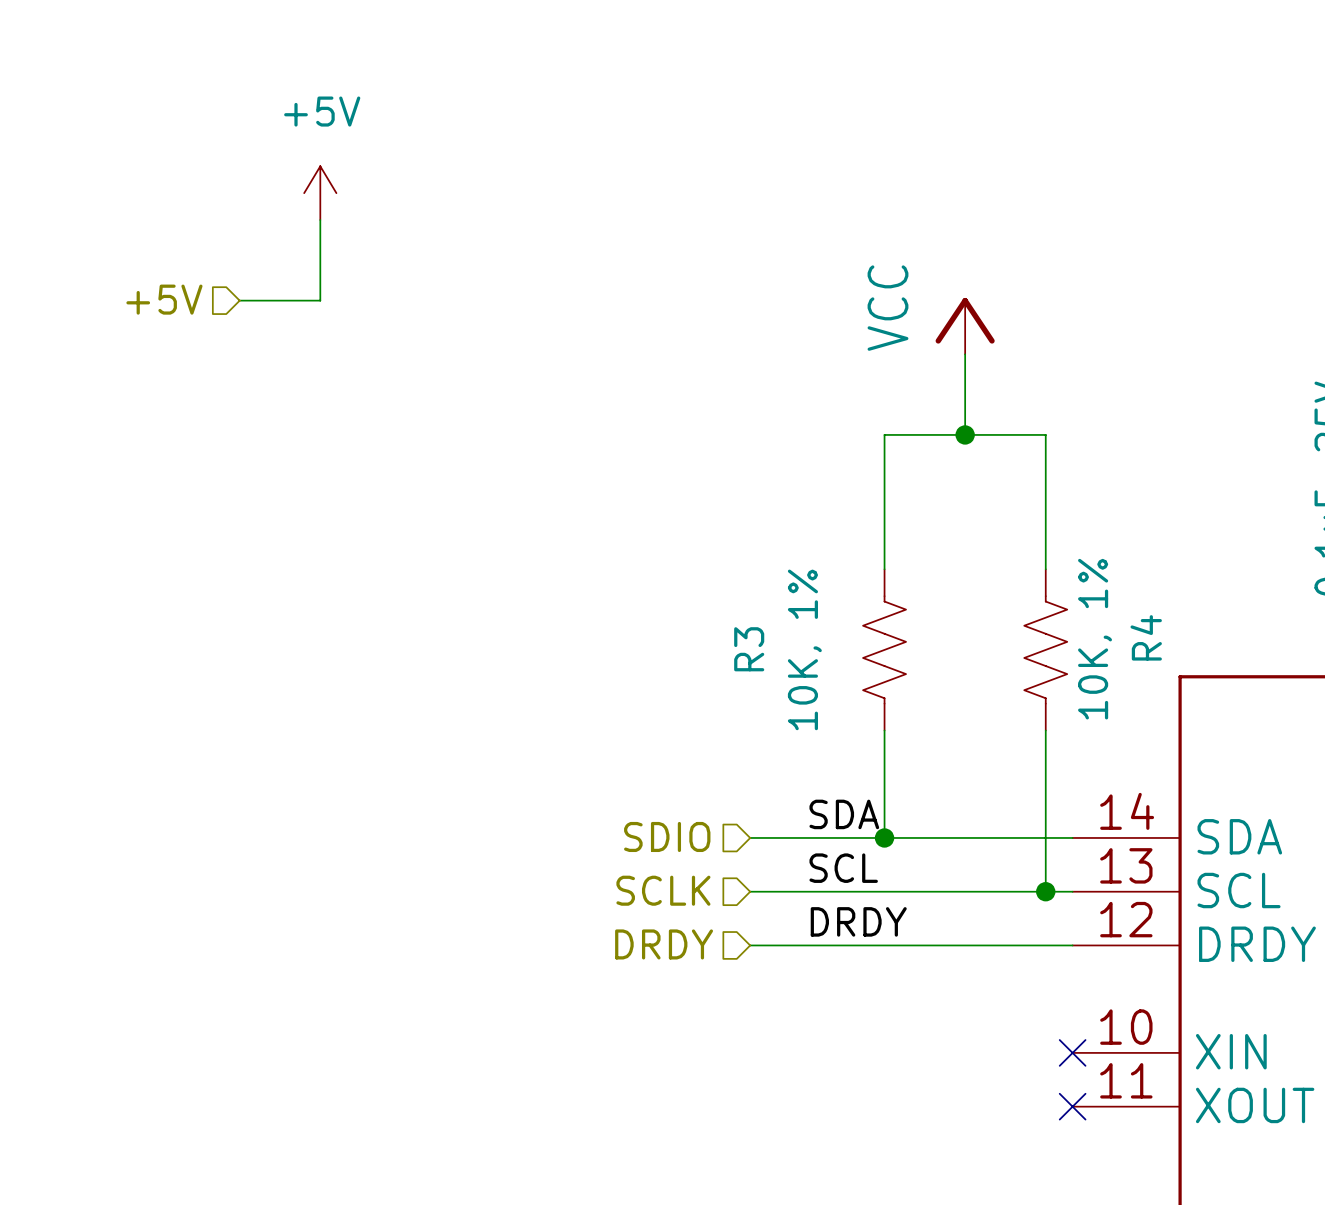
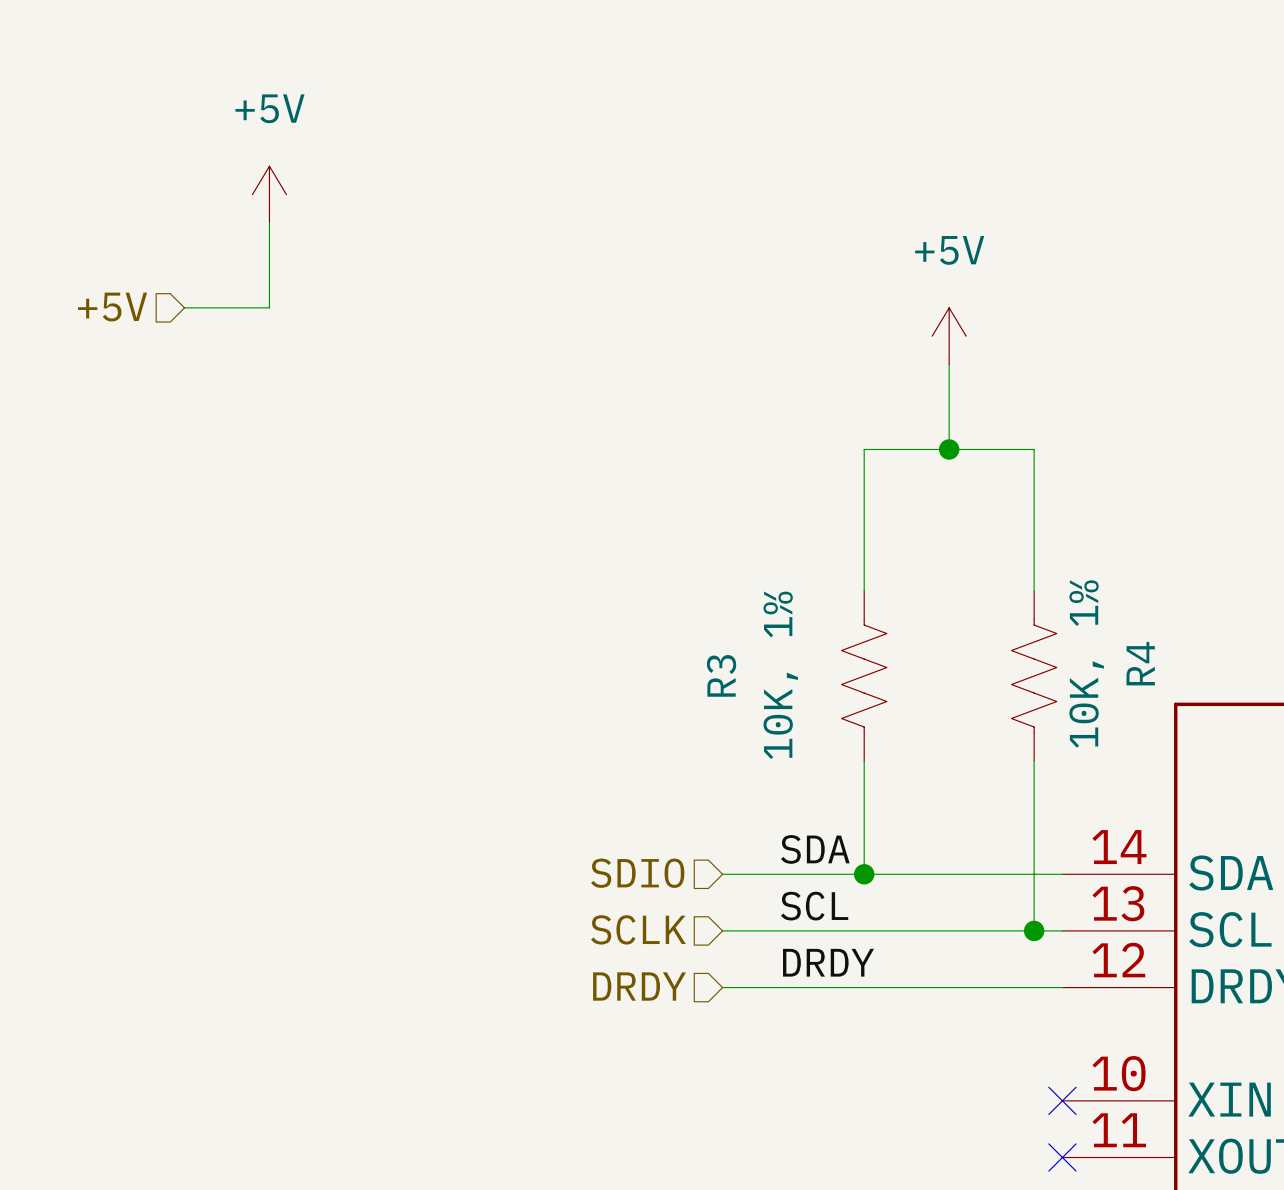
power symbol: VCC (965, 326) -> +5V (949, 336)

